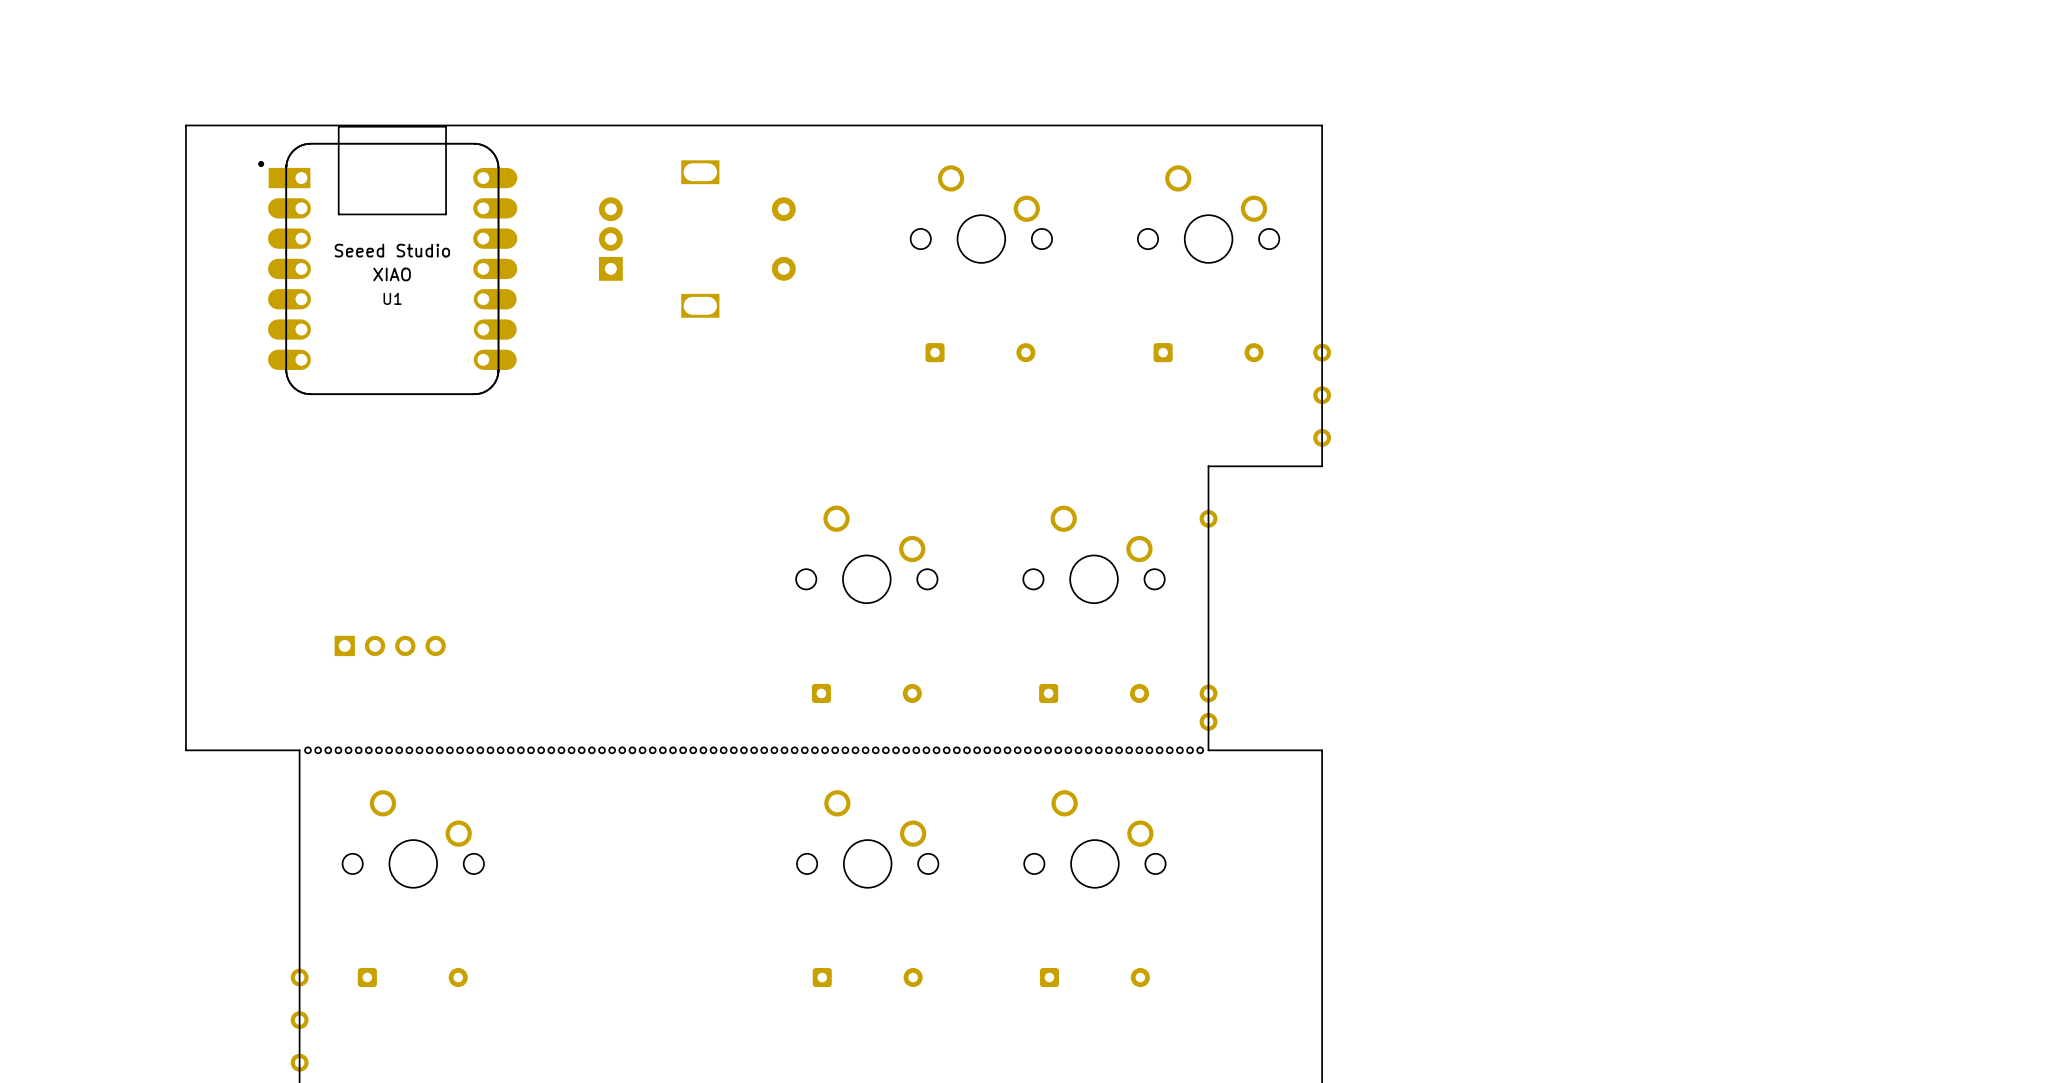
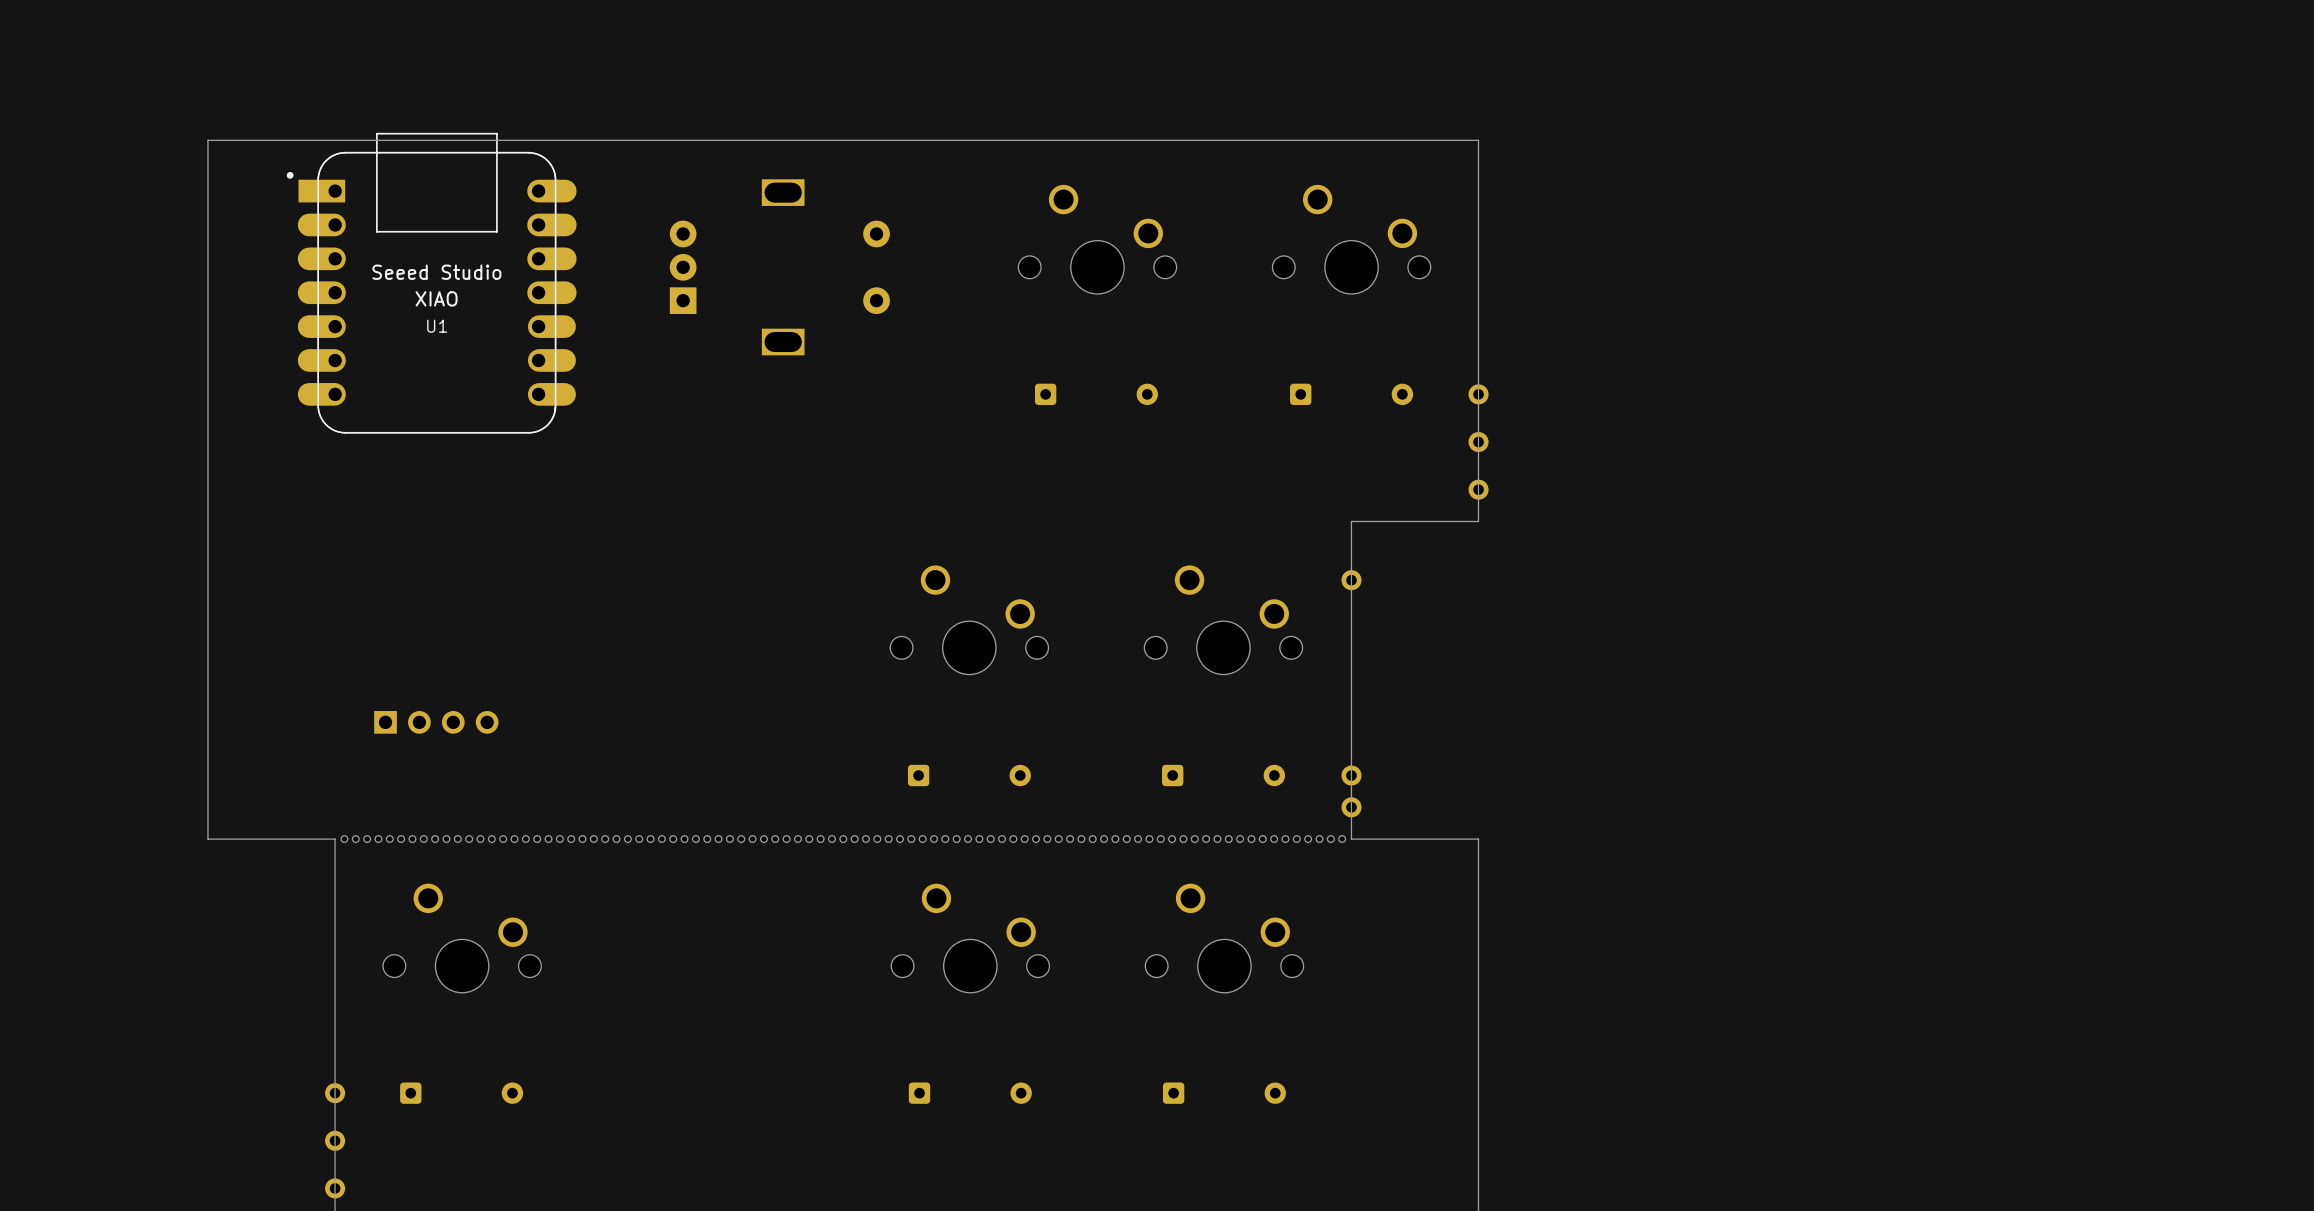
U1 footprint: [258, 125, 518, 395] -> [286, 132, 577, 434]

